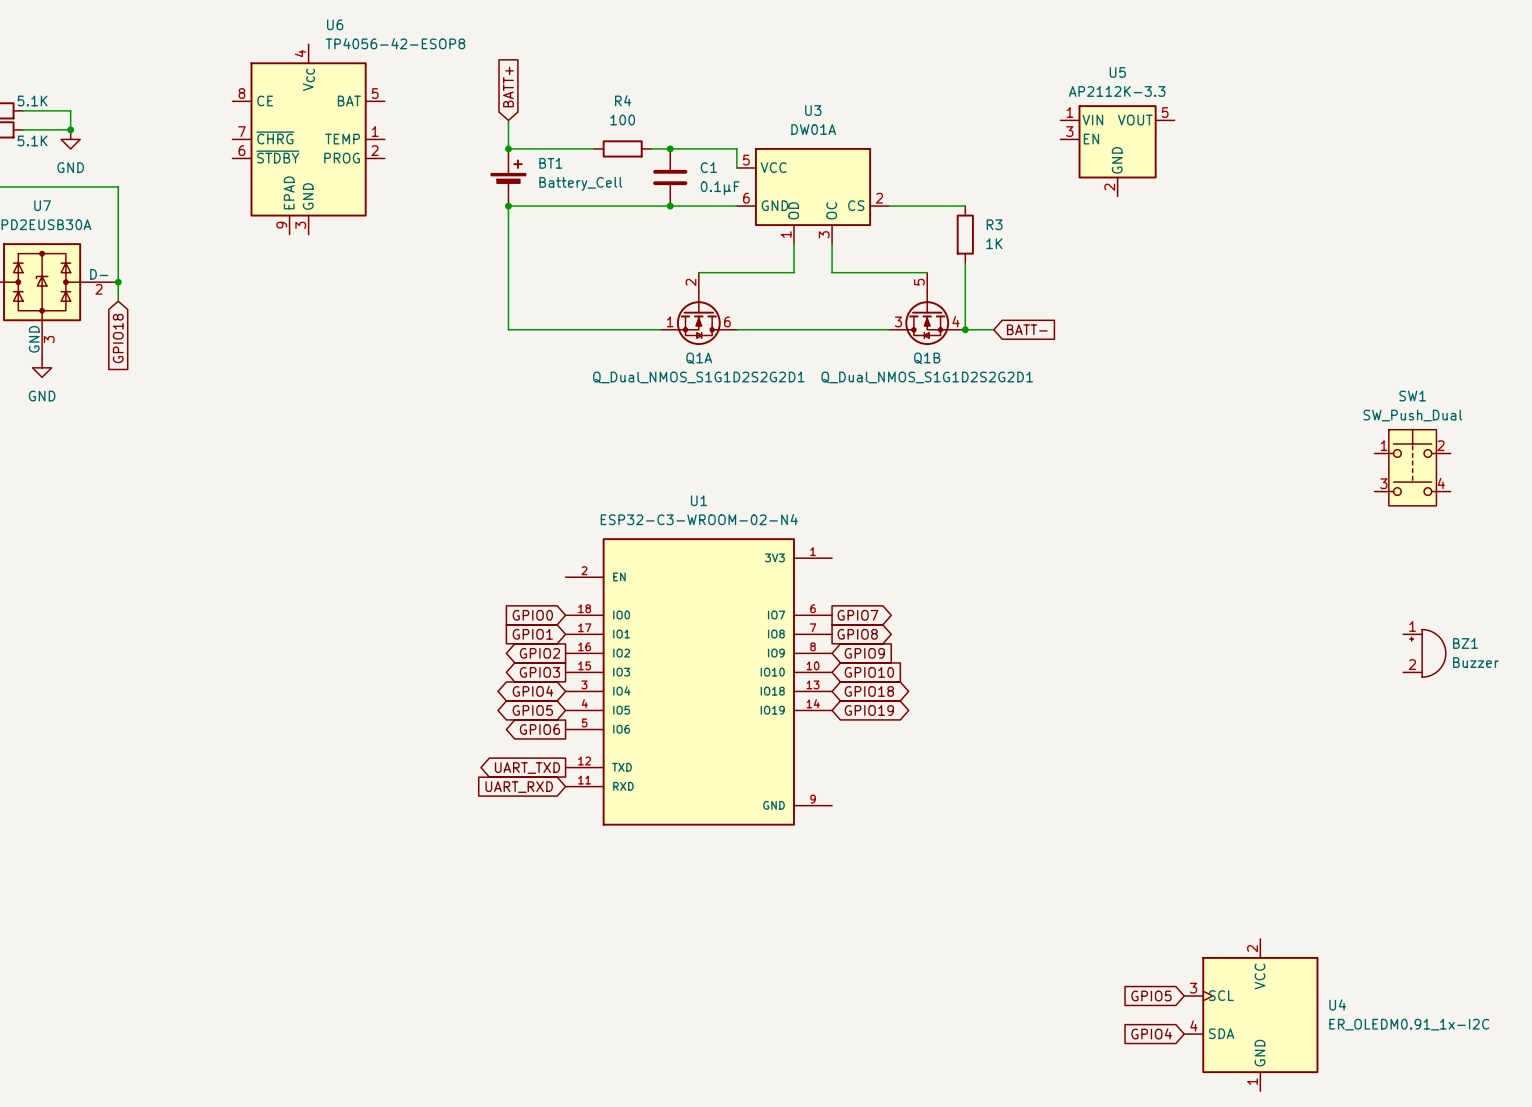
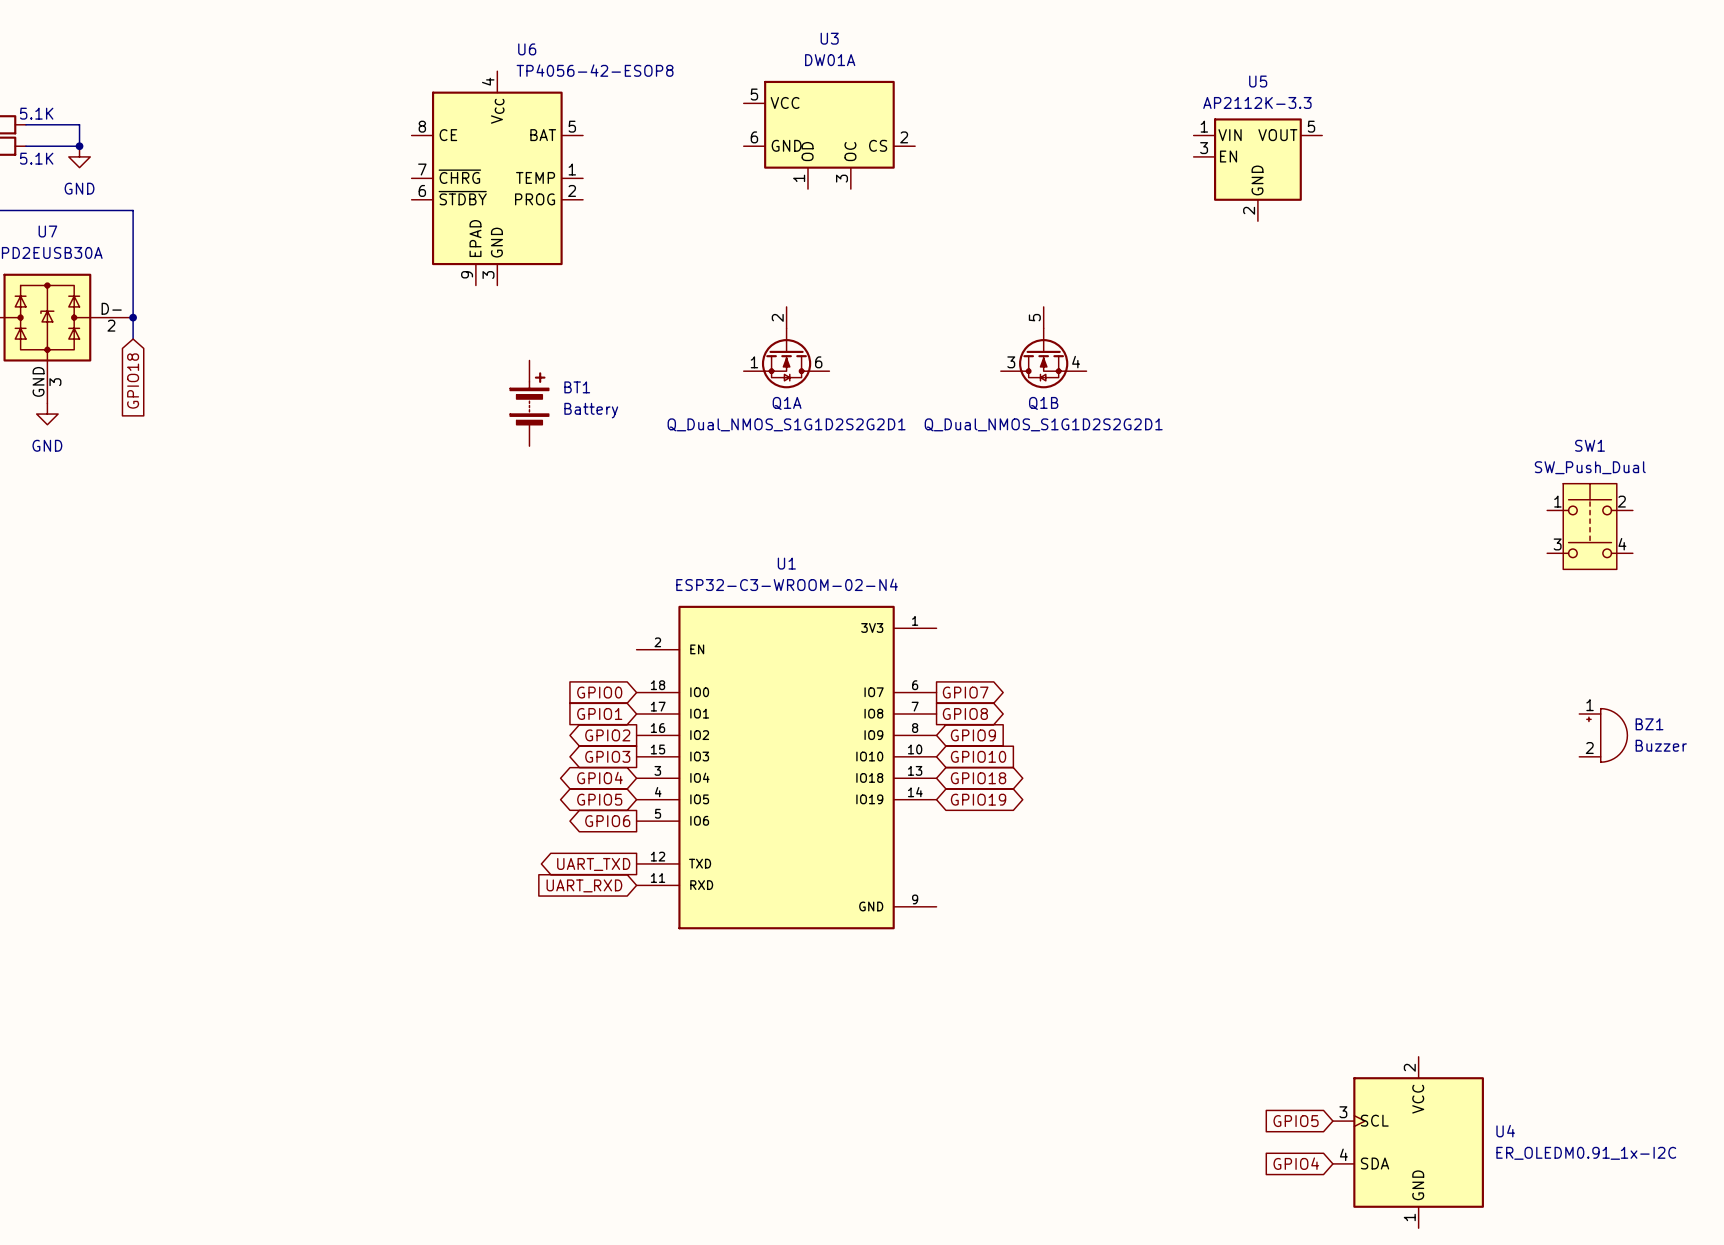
global label: BATT+ (508, 86) -> none
wire: (508, 120) (508, 148) (594, 148) -> none
U6 position: (308, 139) -> (497, 178)
BT1 symbol: [491, 148, 526, 207] -> [510, 360, 549, 447]
junction: (508, 148) -> none
R4: 100 (622, 148) -> none
wire: (651, 148) (736, 148) (736, 167) -> none
junction: (670, 148) -> none
C1: 0.1μF (670, 177) -> none
BT1 value: Battery_Cell (580, 183) -> Battery (591, 410)
U3 position: (813, 196) -> (829, 134)
junction: (508, 206) -> none
junction: (670, 206) -> none
wire: (736, 206) (508, 206) (508, 329) (660, 329) -> none
wire: (889, 206) (965, 206) -> none
R3: 1K (965, 234) -> none
wire: (793, 244) (793, 272) (698, 272) -> none
wire: (832, 244) (832, 272) (927, 272) -> none
wire: (965, 263) (965, 329) (993, 329) -> none
wire: (736, 329) (889, 329) -> none
junction: (965, 329) -> none
global label: BATT- (1027, 329) -> none

